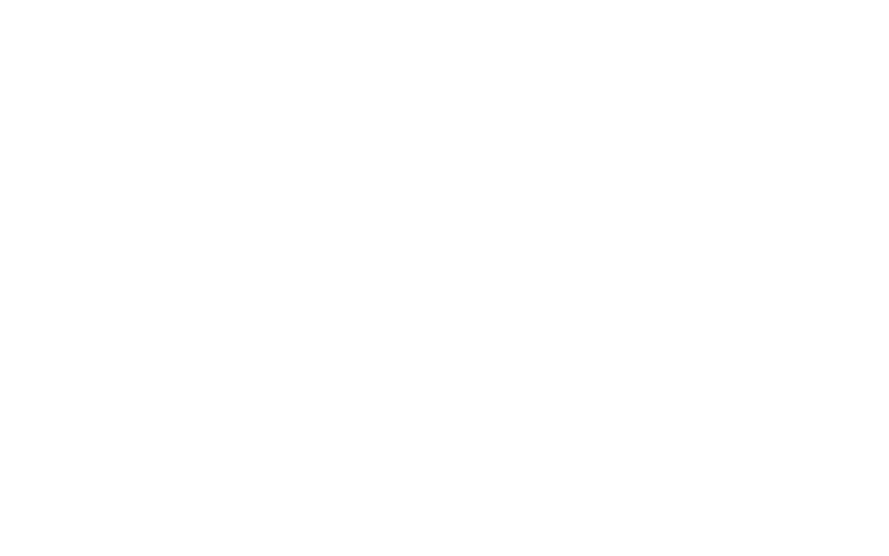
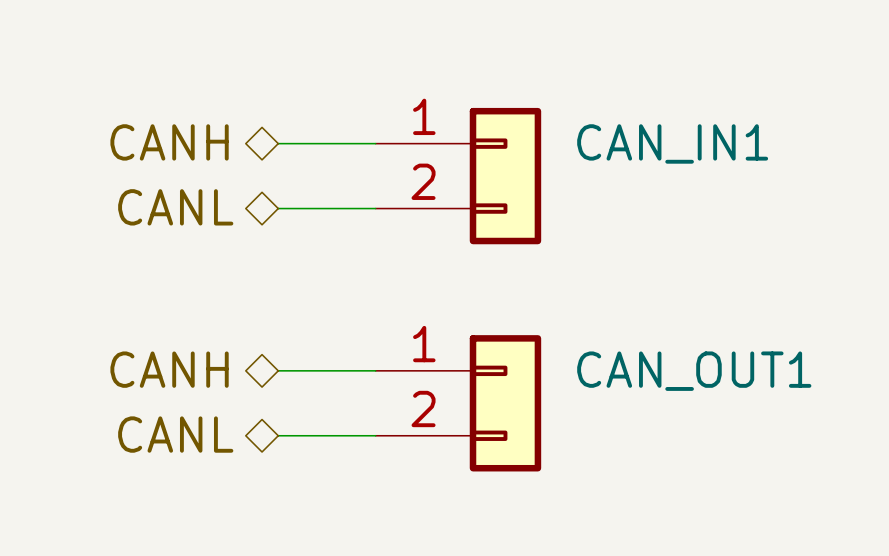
hierarchical label: none -> CANH (169, 142)
wire: none -> (278, 143) (375, 143)
CAN_IN1: none -> (458, 176)
hierarchical label: none -> CANL (175, 207)
wire: none -> (278, 208) (375, 208)
hierarchical label: none -> CANH (169, 369)
wire: none -> (278, 370) (375, 370)
CAN_OUT1: none -> (458, 403)
hierarchical label: none -> CANL (175, 434)
wire: none -> (278, 435) (375, 435)

